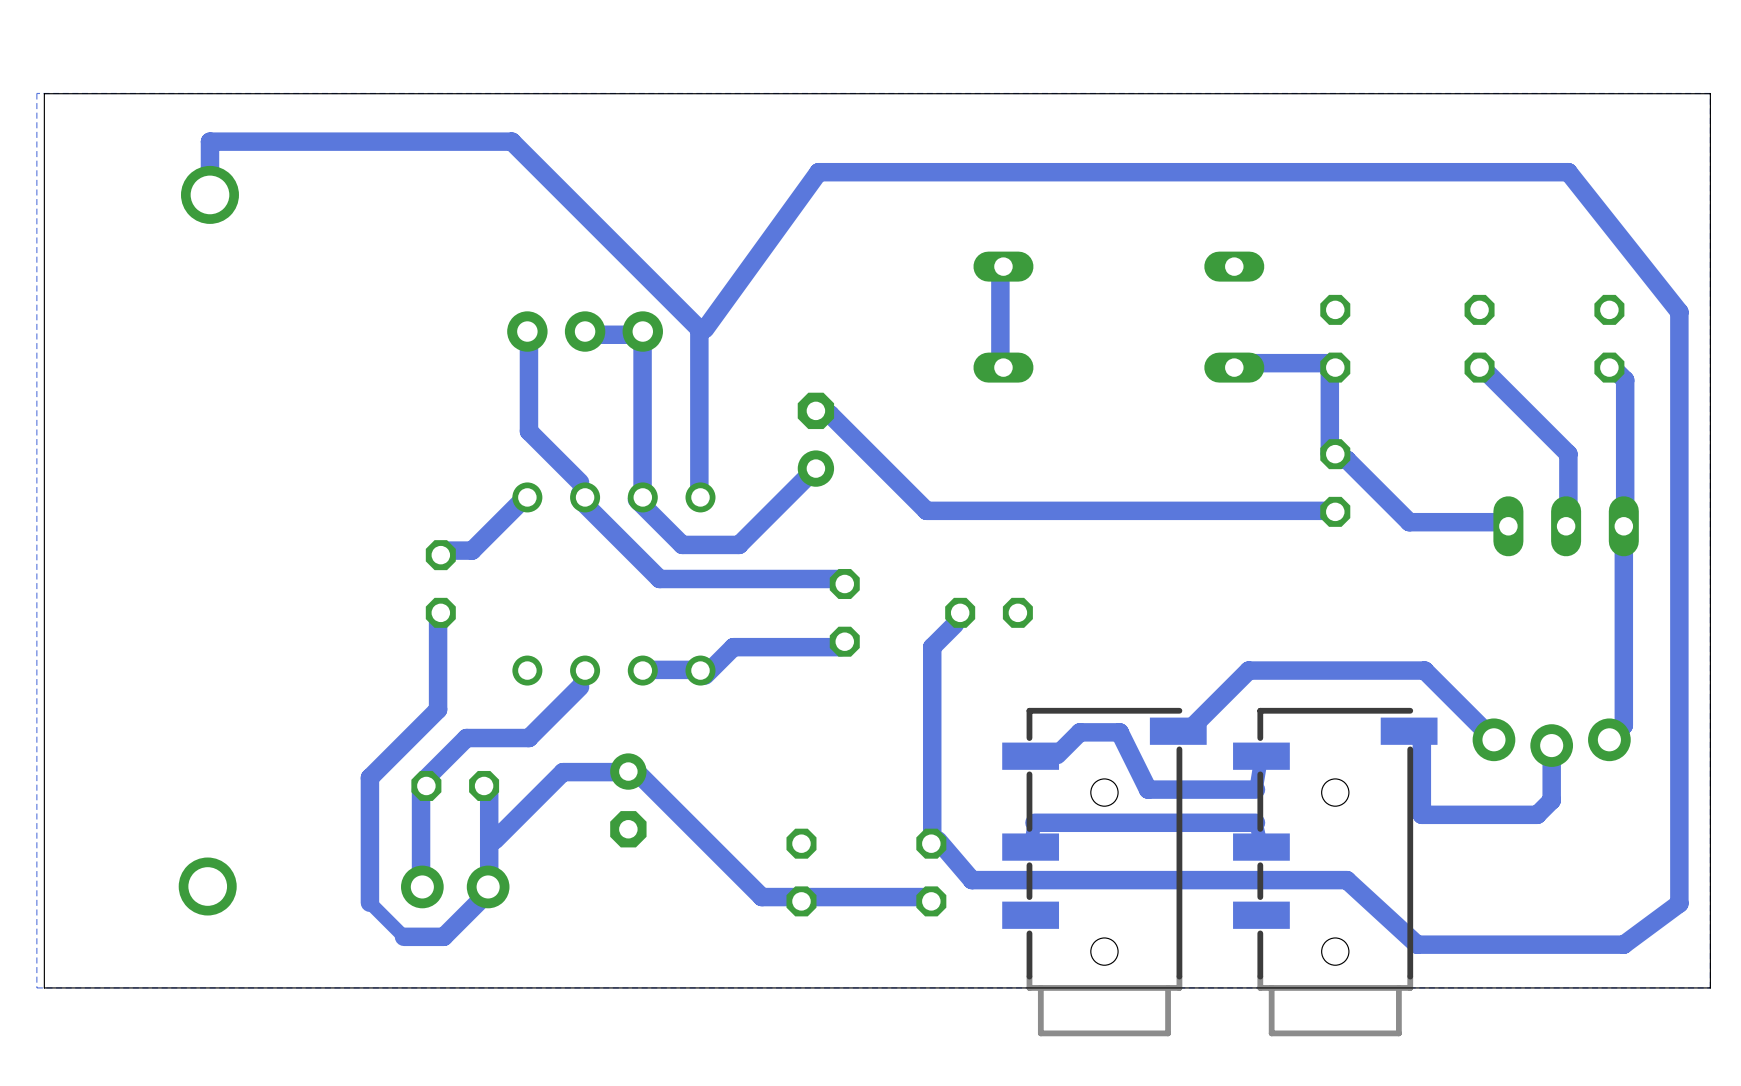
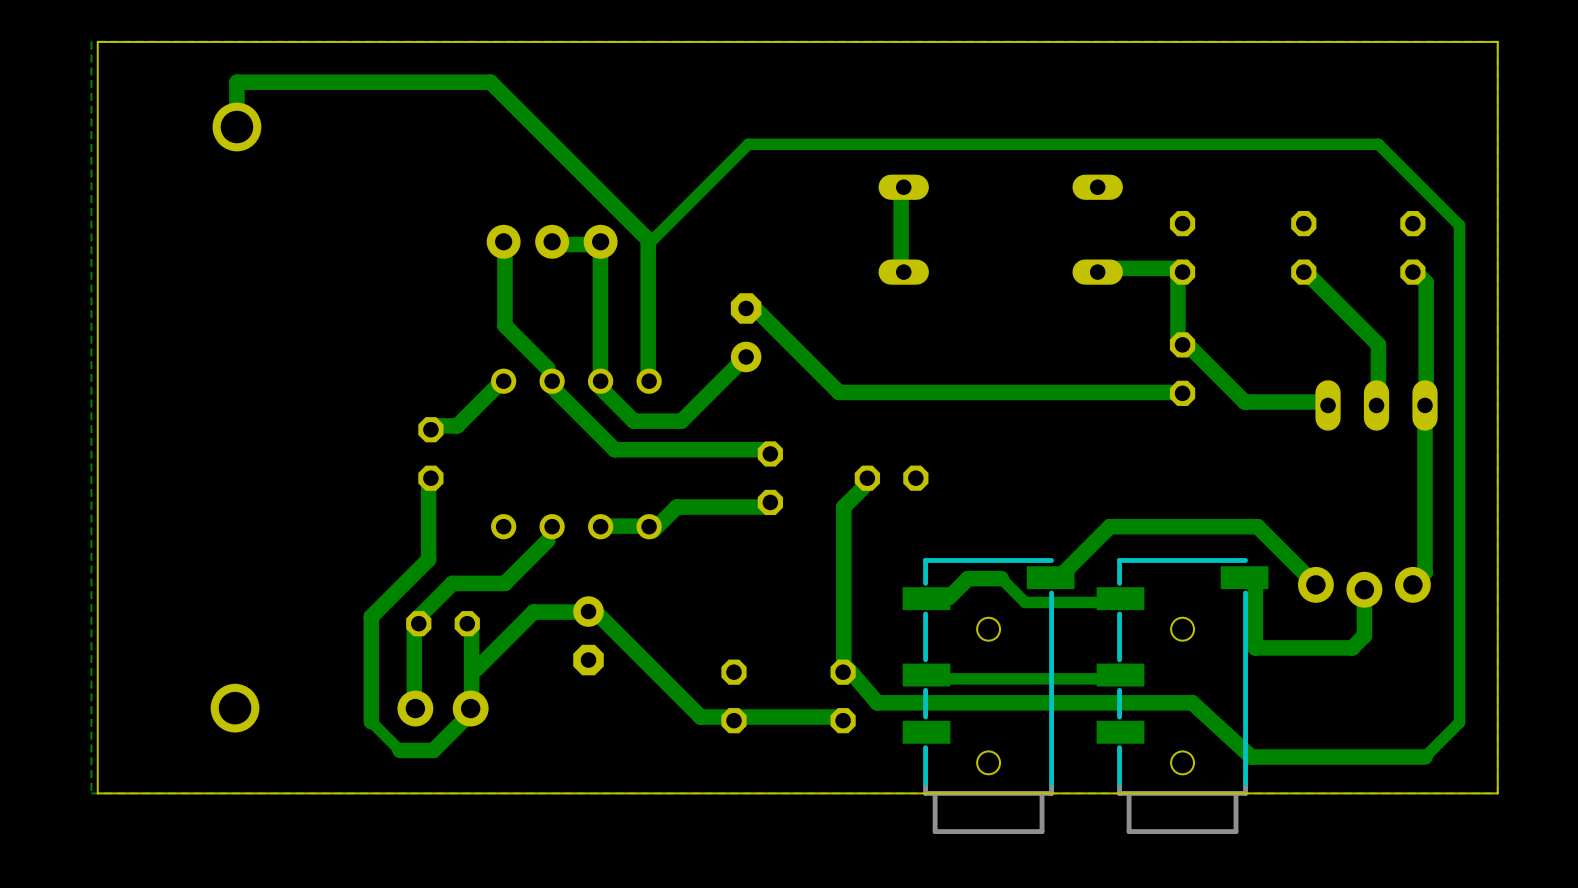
bottom track: (705, 329) (818, 172) (1568, 172) (1679, 312) (1679, 903) (1623, 944) -> (652, 239) (748, 144) (1378, 144) (1459, 225) (1459, 722) (1425, 757)
bottom track: (1119, 732) (1148, 789) (1255, 789) (1261, 756) -> (1001, 578) (1025, 602) (1115, 602) (1120, 598)
bottom track: (1261, 847) (1255, 822) (1034, 822) (1030, 847) -> (1120, 675) (1115, 678) (929, 678) (926, 675)

